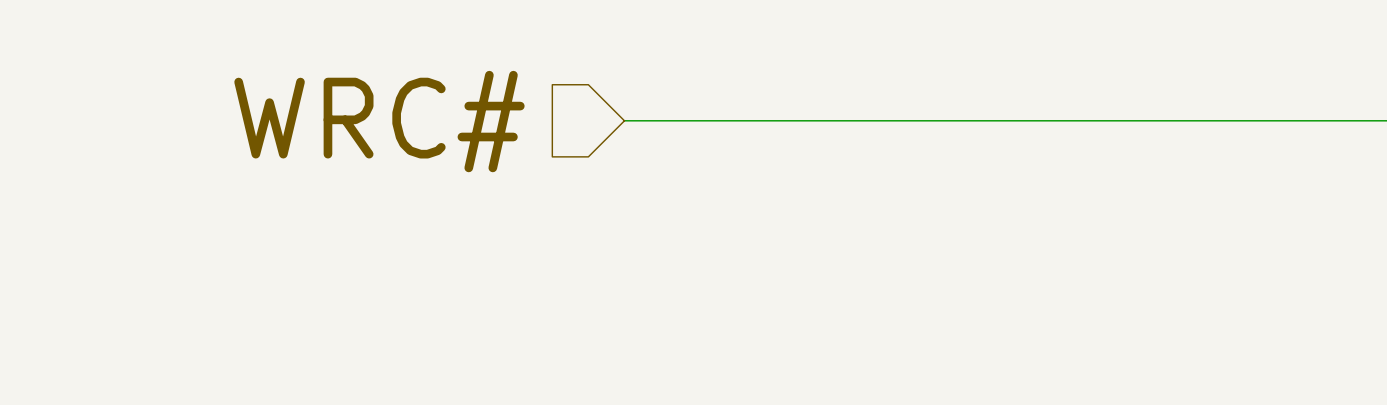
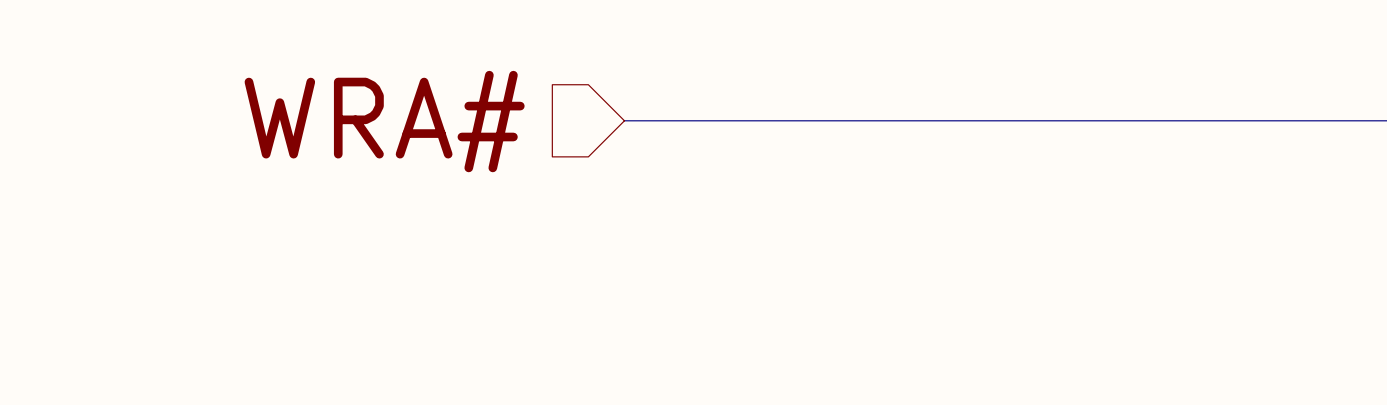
hierarchical label: WRC# (379, 121) -> WRA# (384, 121)

